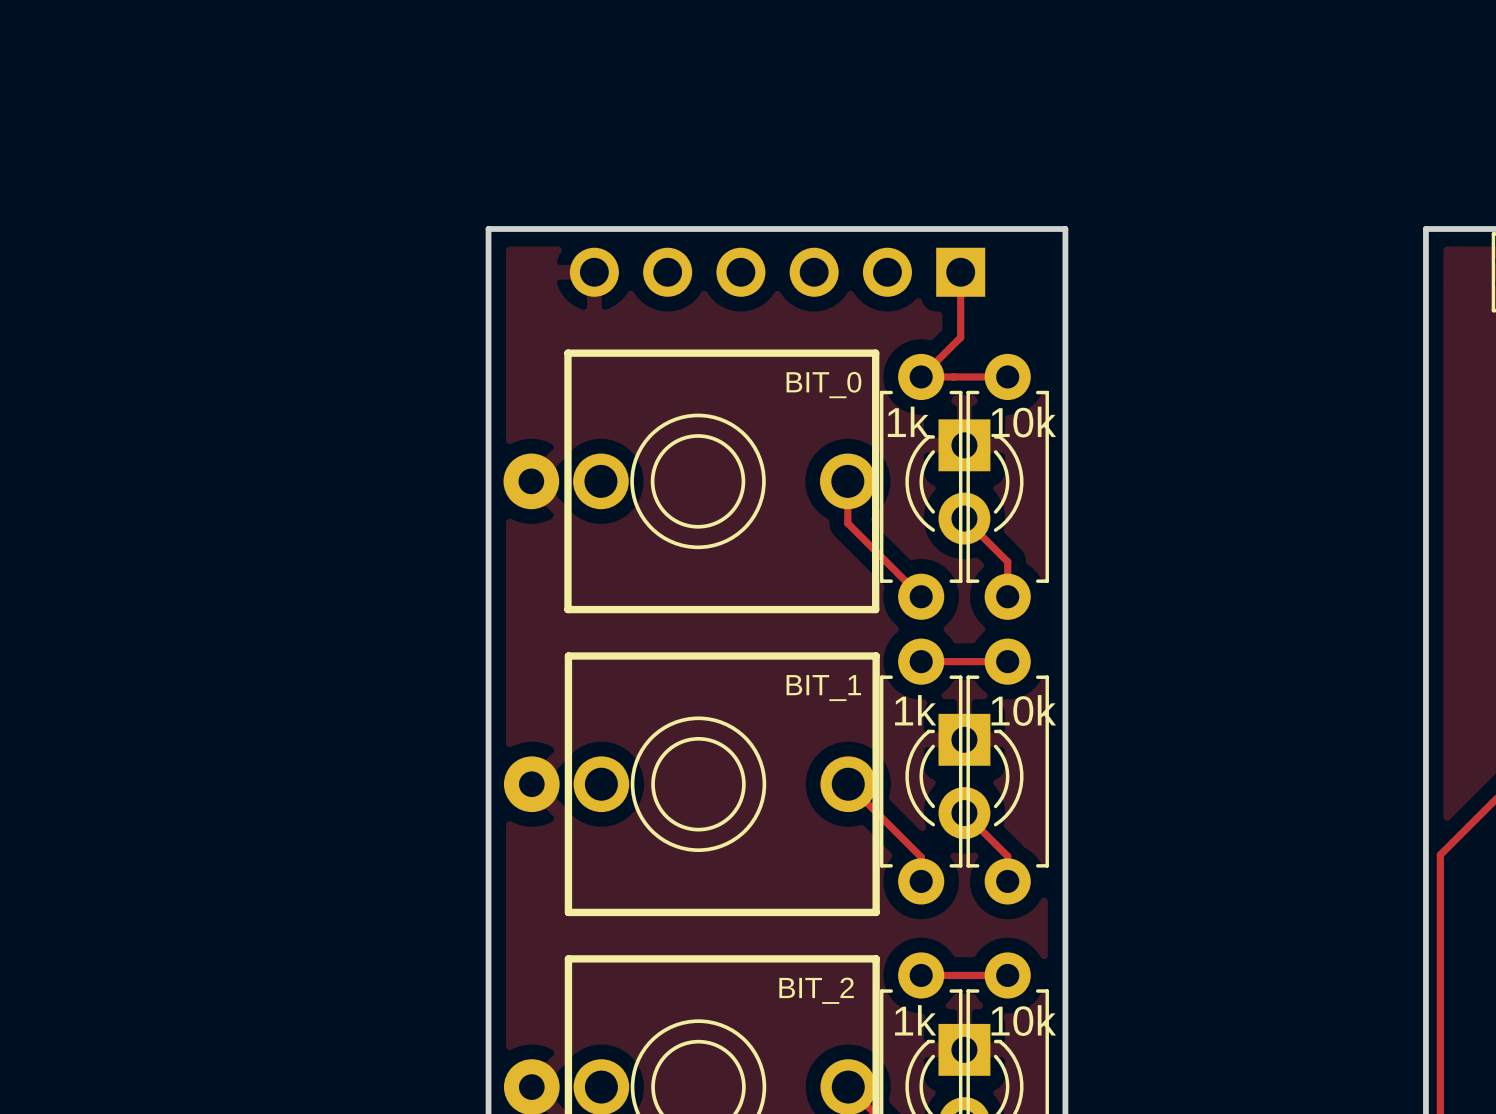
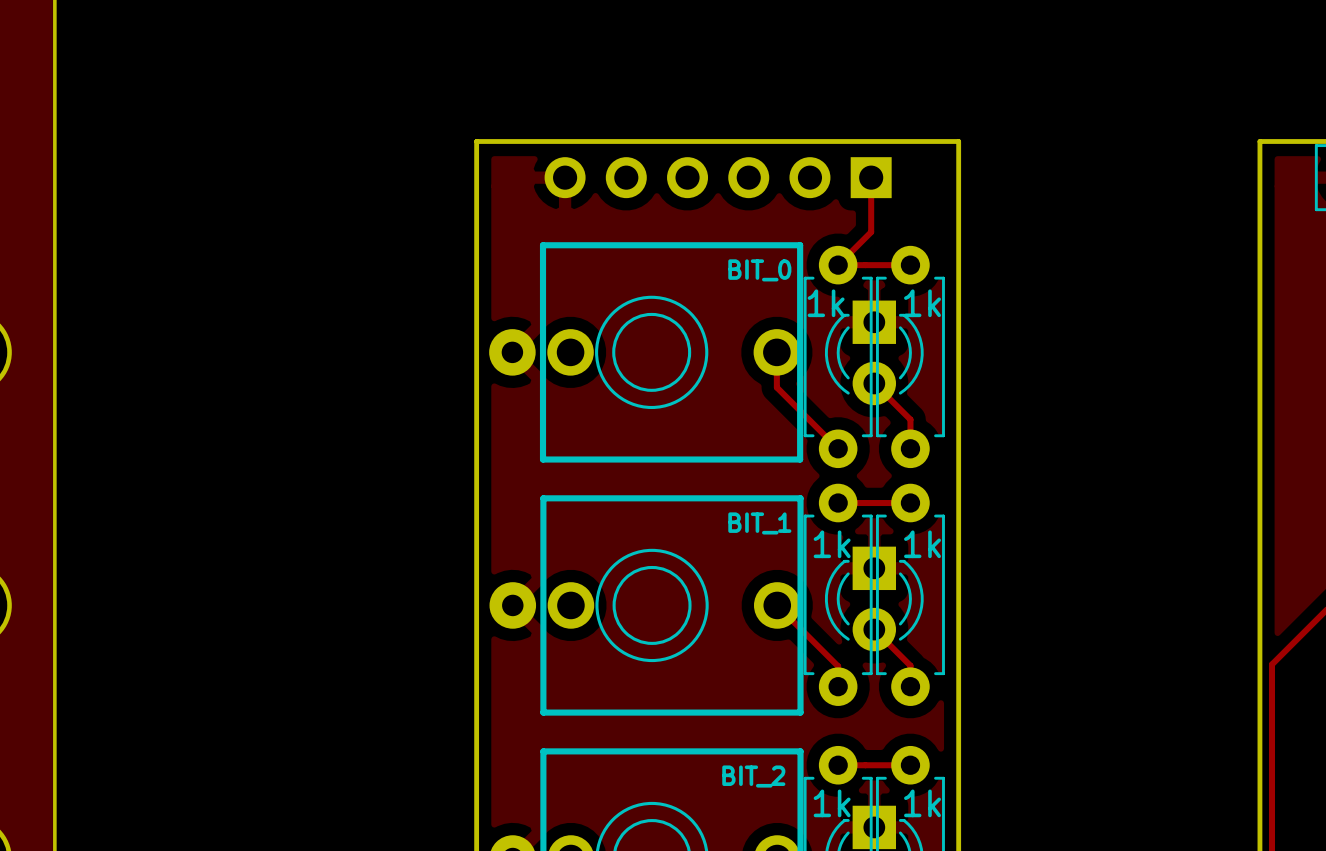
part value: 10k (1023, 422) -> 1k (922, 303)
part value: 10k (1023, 710) -> 1k (922, 544)
part value: 10k (1023, 1020) -> 1k (922, 803)

